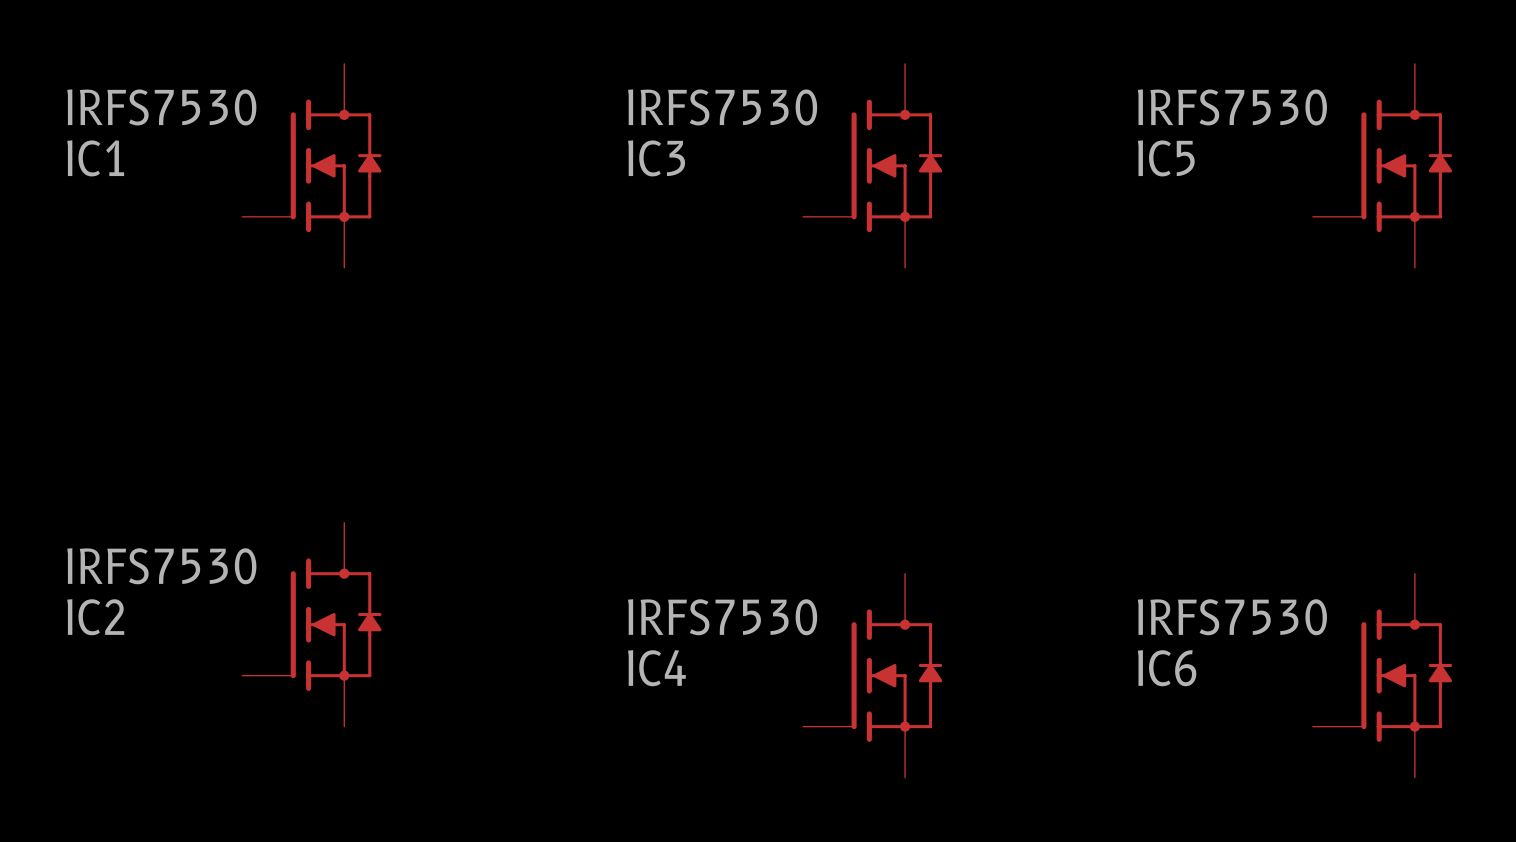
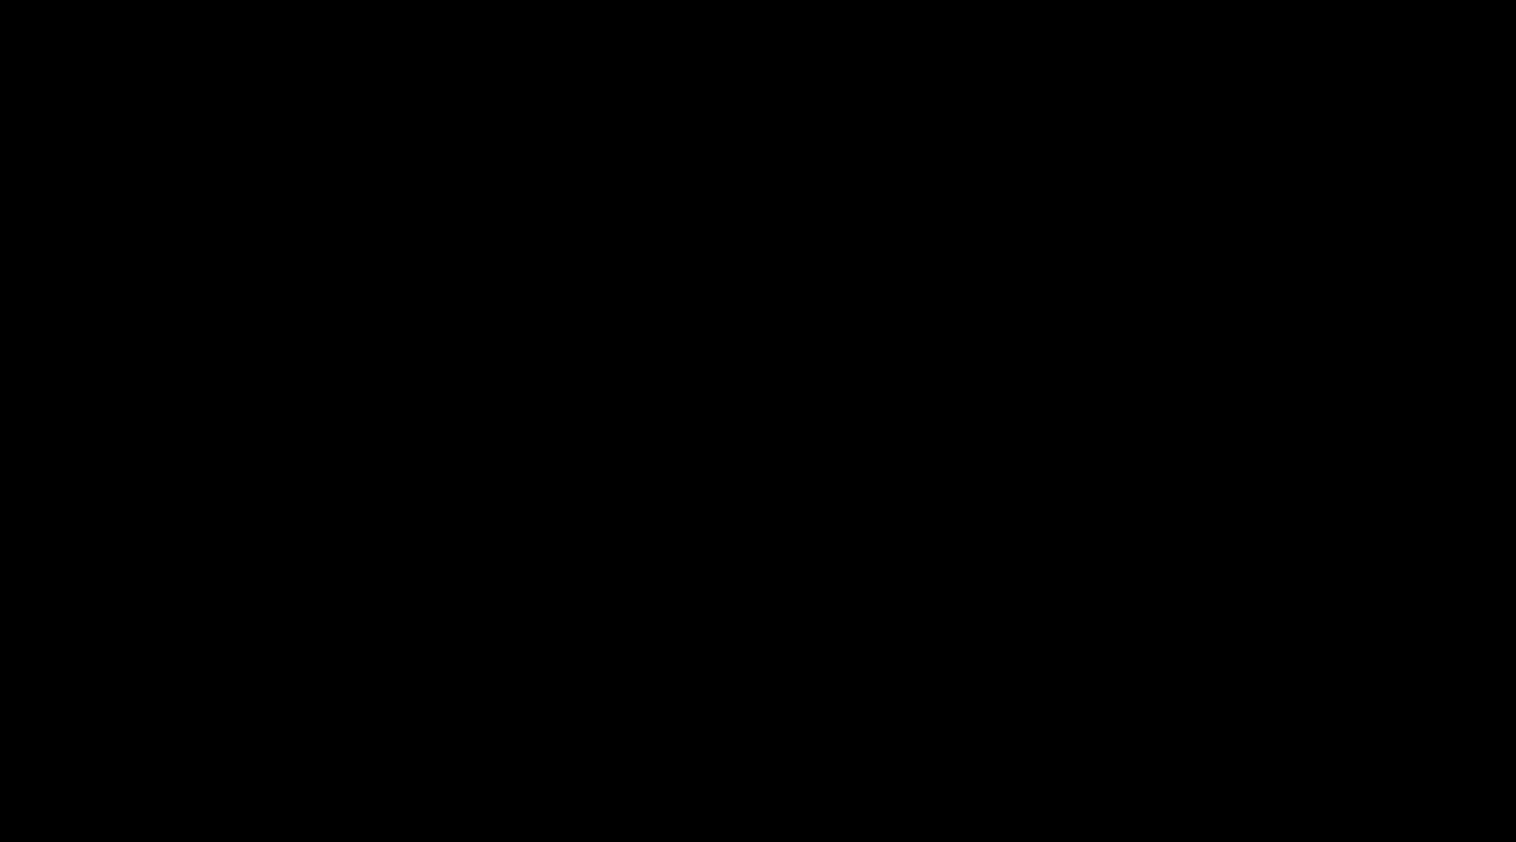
IC1: IRFS7530 (311, 165) -> none
IC3: IRFS7530 (872, 165) -> none
IC5: IRFS7530 (1382, 165) -> none
IC2: IRFS7530 (311, 624) -> none
IC4: IRFS7530 (872, 675) -> none
IC6: IRFS7530 (1382, 675) -> none

